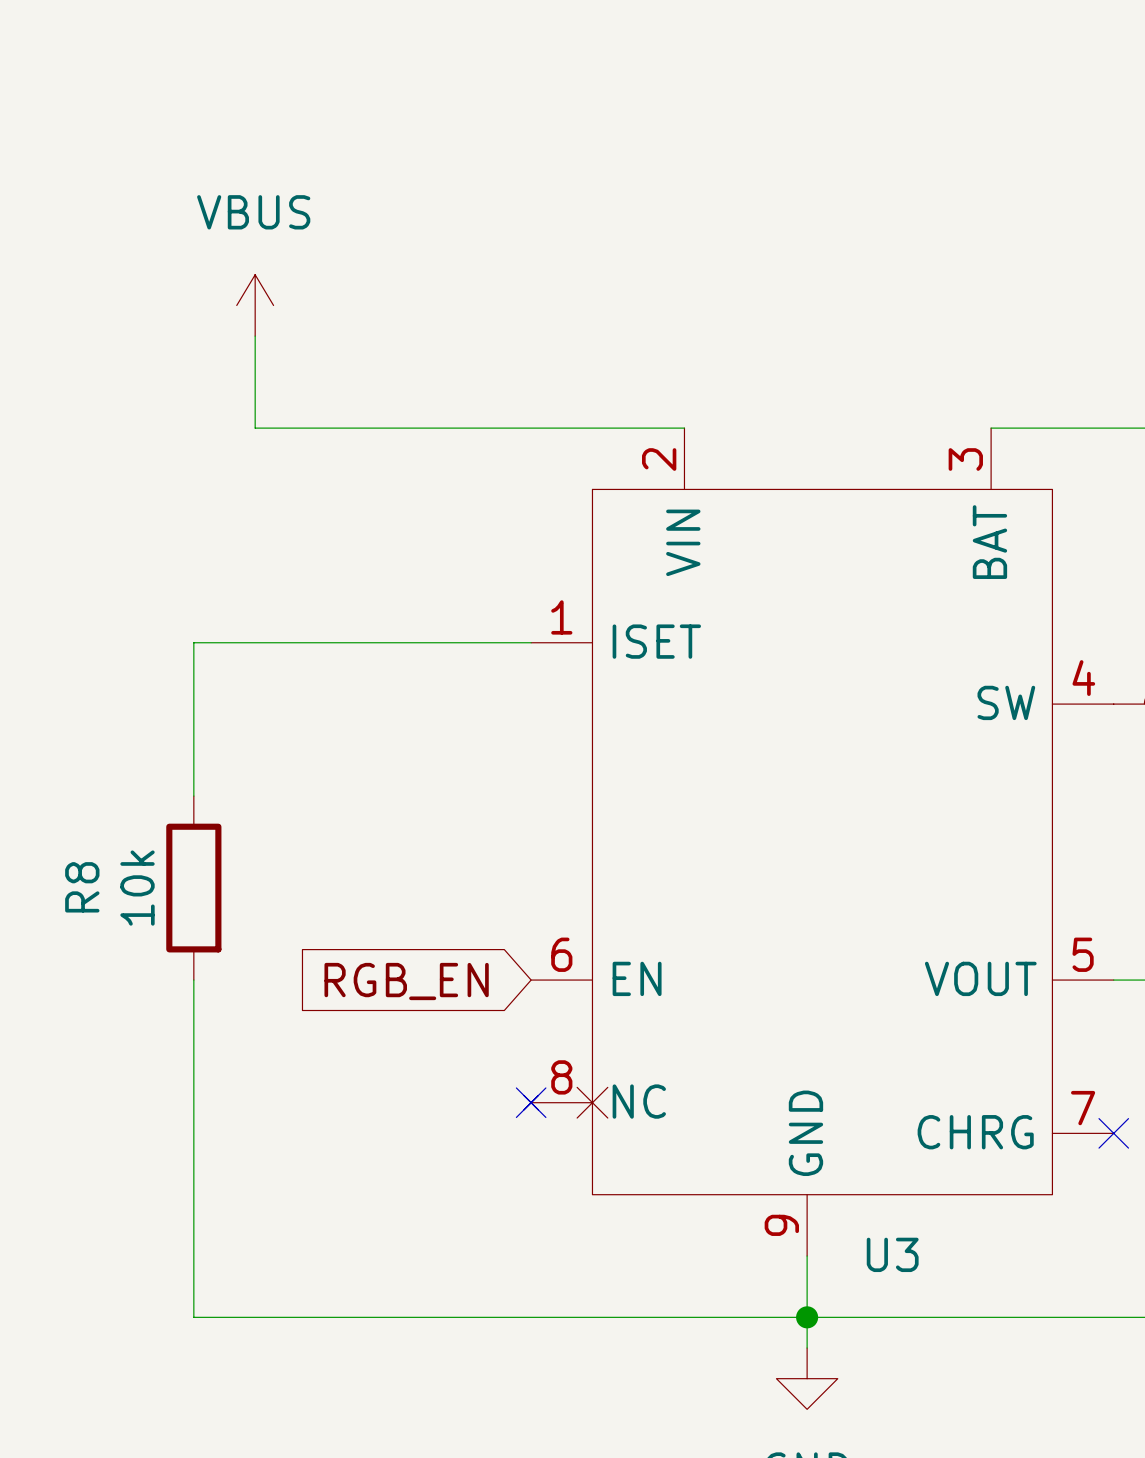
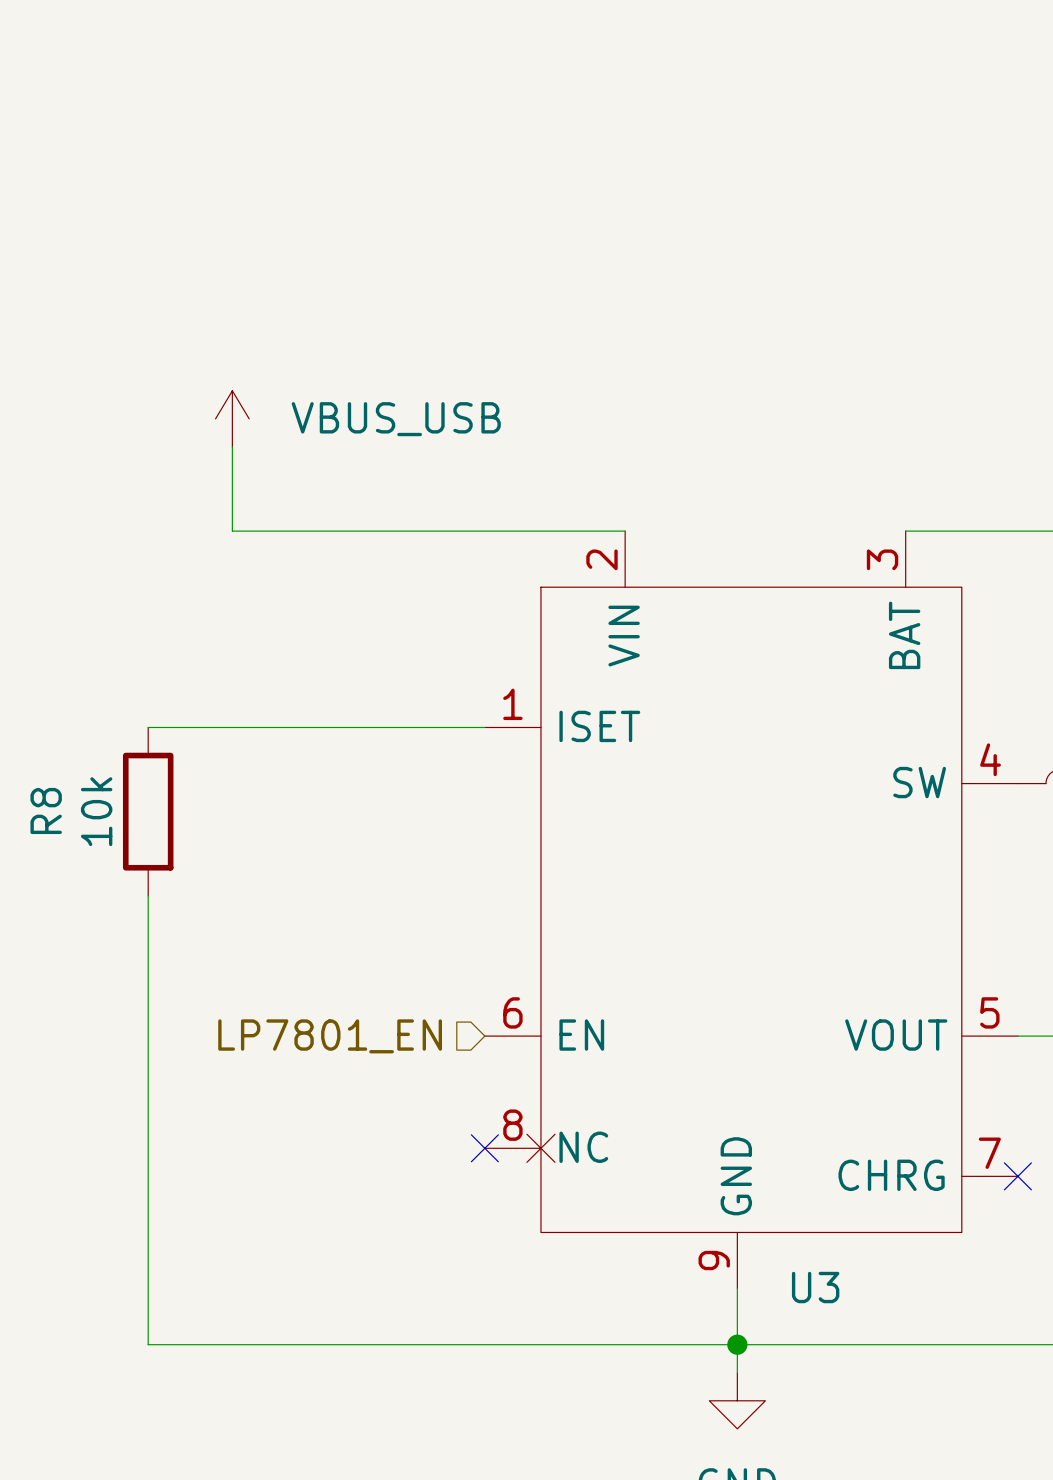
power symbol: VBUS (255, 305) -> VBUS_USB (232, 418)
U3 symbol: [523, 428, 1114, 1257] -> [484, 531, 1018, 1289]
wire: (193, 642) (193, 796) -> (176, 727) (148, 727)
R8 position: (193, 888) -> (148, 811)
wire: (193, 980) (193, 1317) -> (148, 895) (148, 1344) (176, 1344)
hierarchical label: none -> LP7801_EN (330, 1036)
global label: RGB_EN (406, 981) -> none

